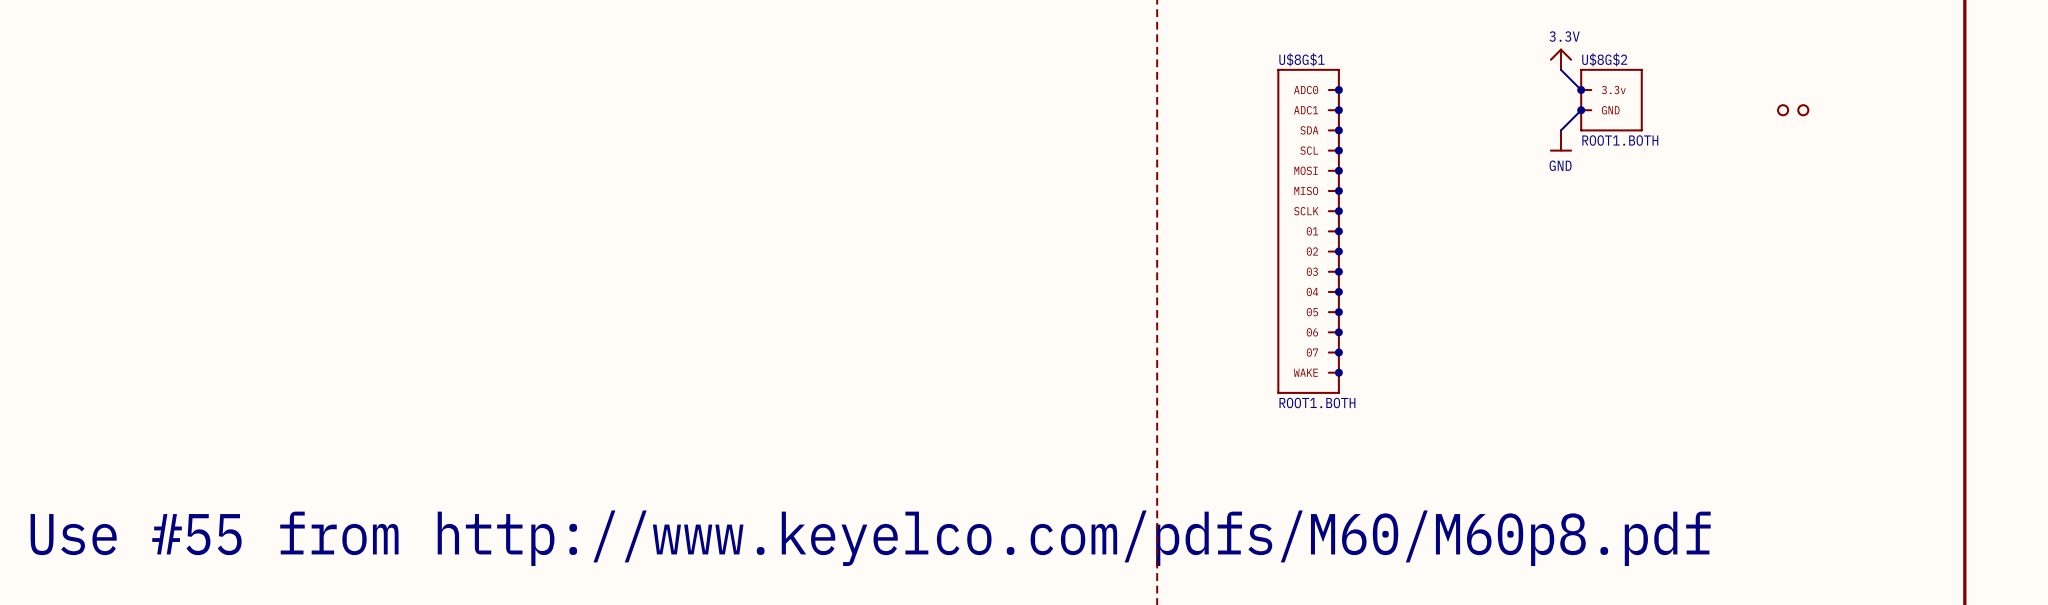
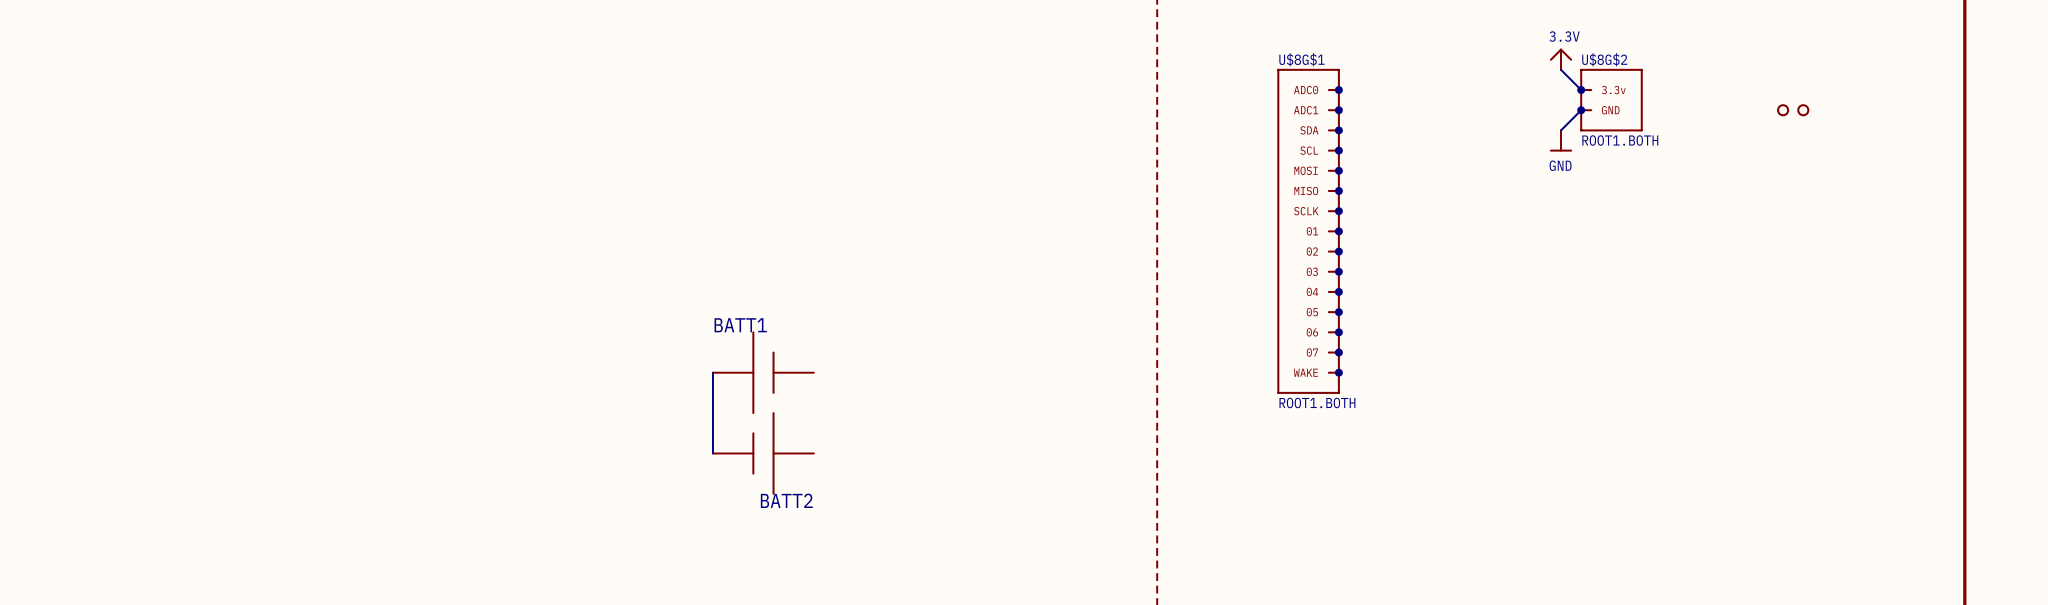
wire: none -> (712, 372) (712, 453)
BATT1: none -> (763, 372)
BATT2: none -> (763, 453)
text: Use #55 from http://www.keyelco.com/pdfs/M60/M60p8.pdf (870, 538) -> none

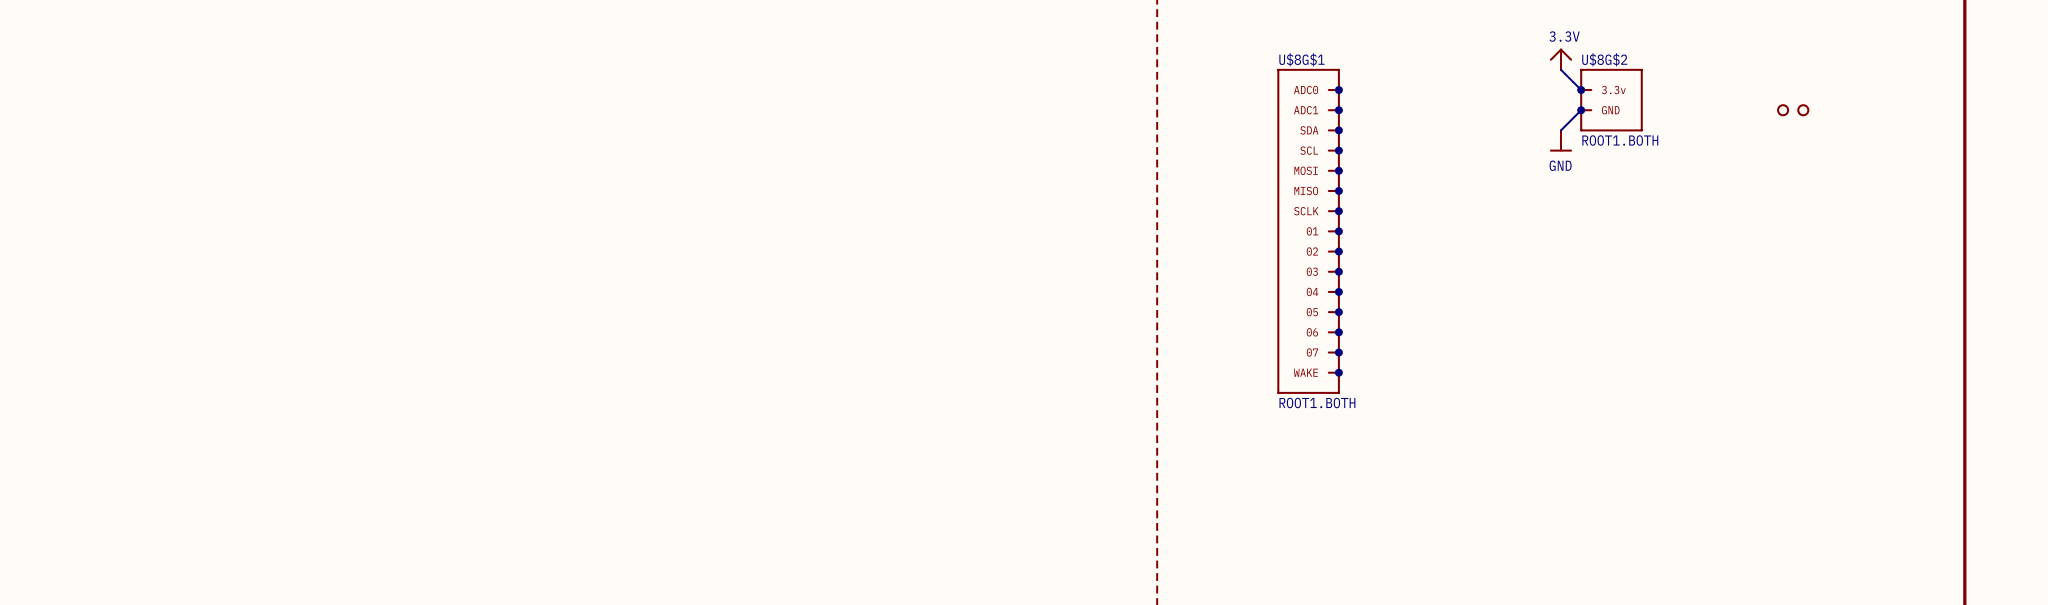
wire: (712, 372) (712, 453) -> none
BATT1: (763, 372) -> none
BATT2: (763, 453) -> none

